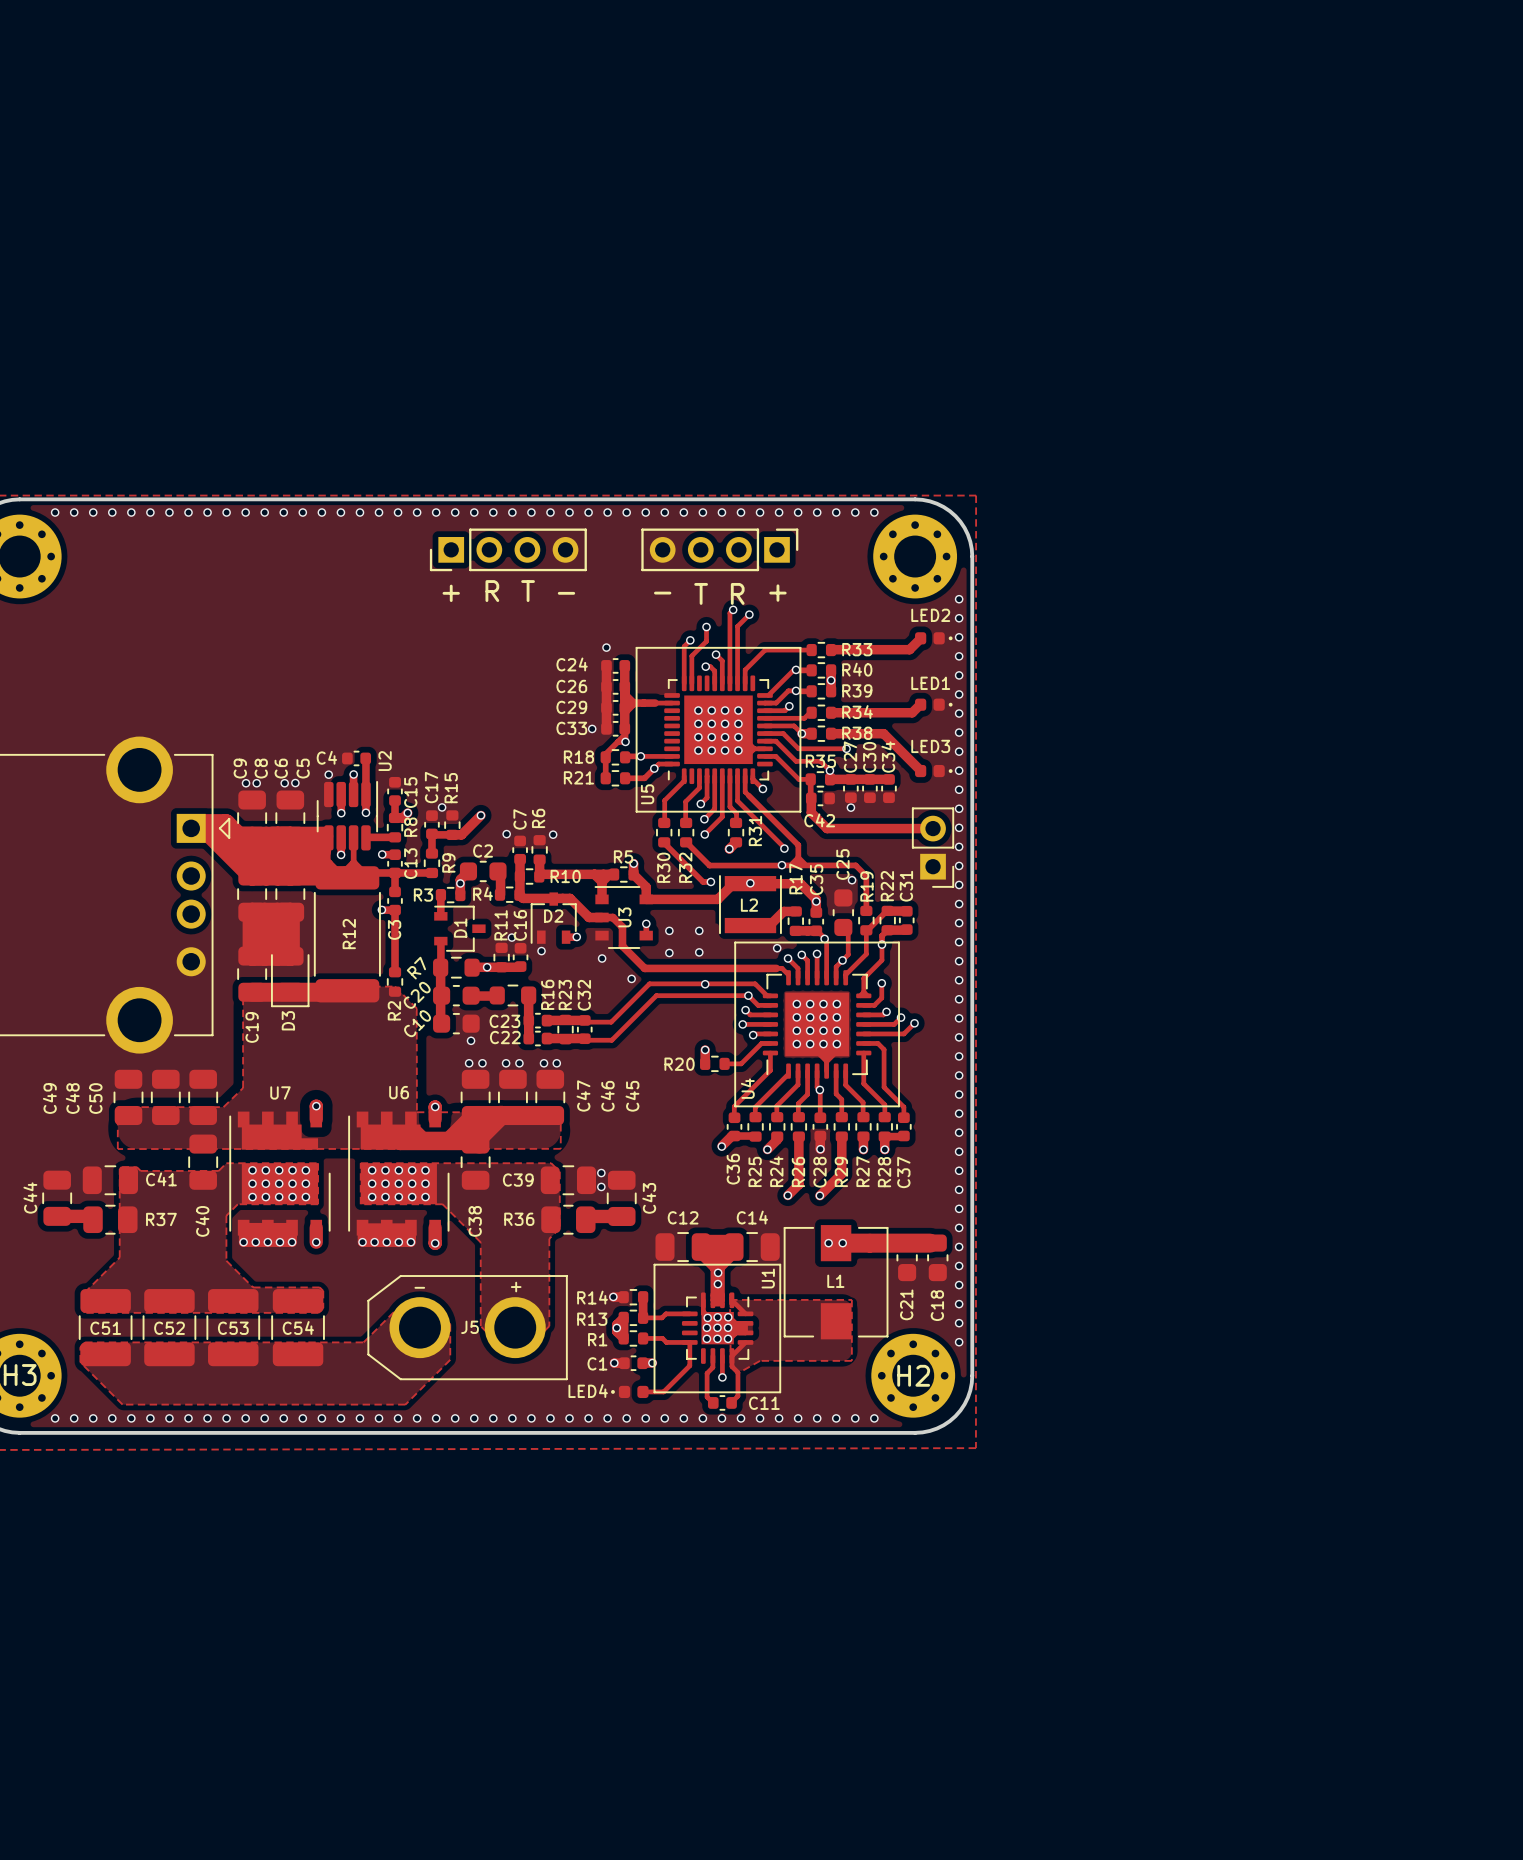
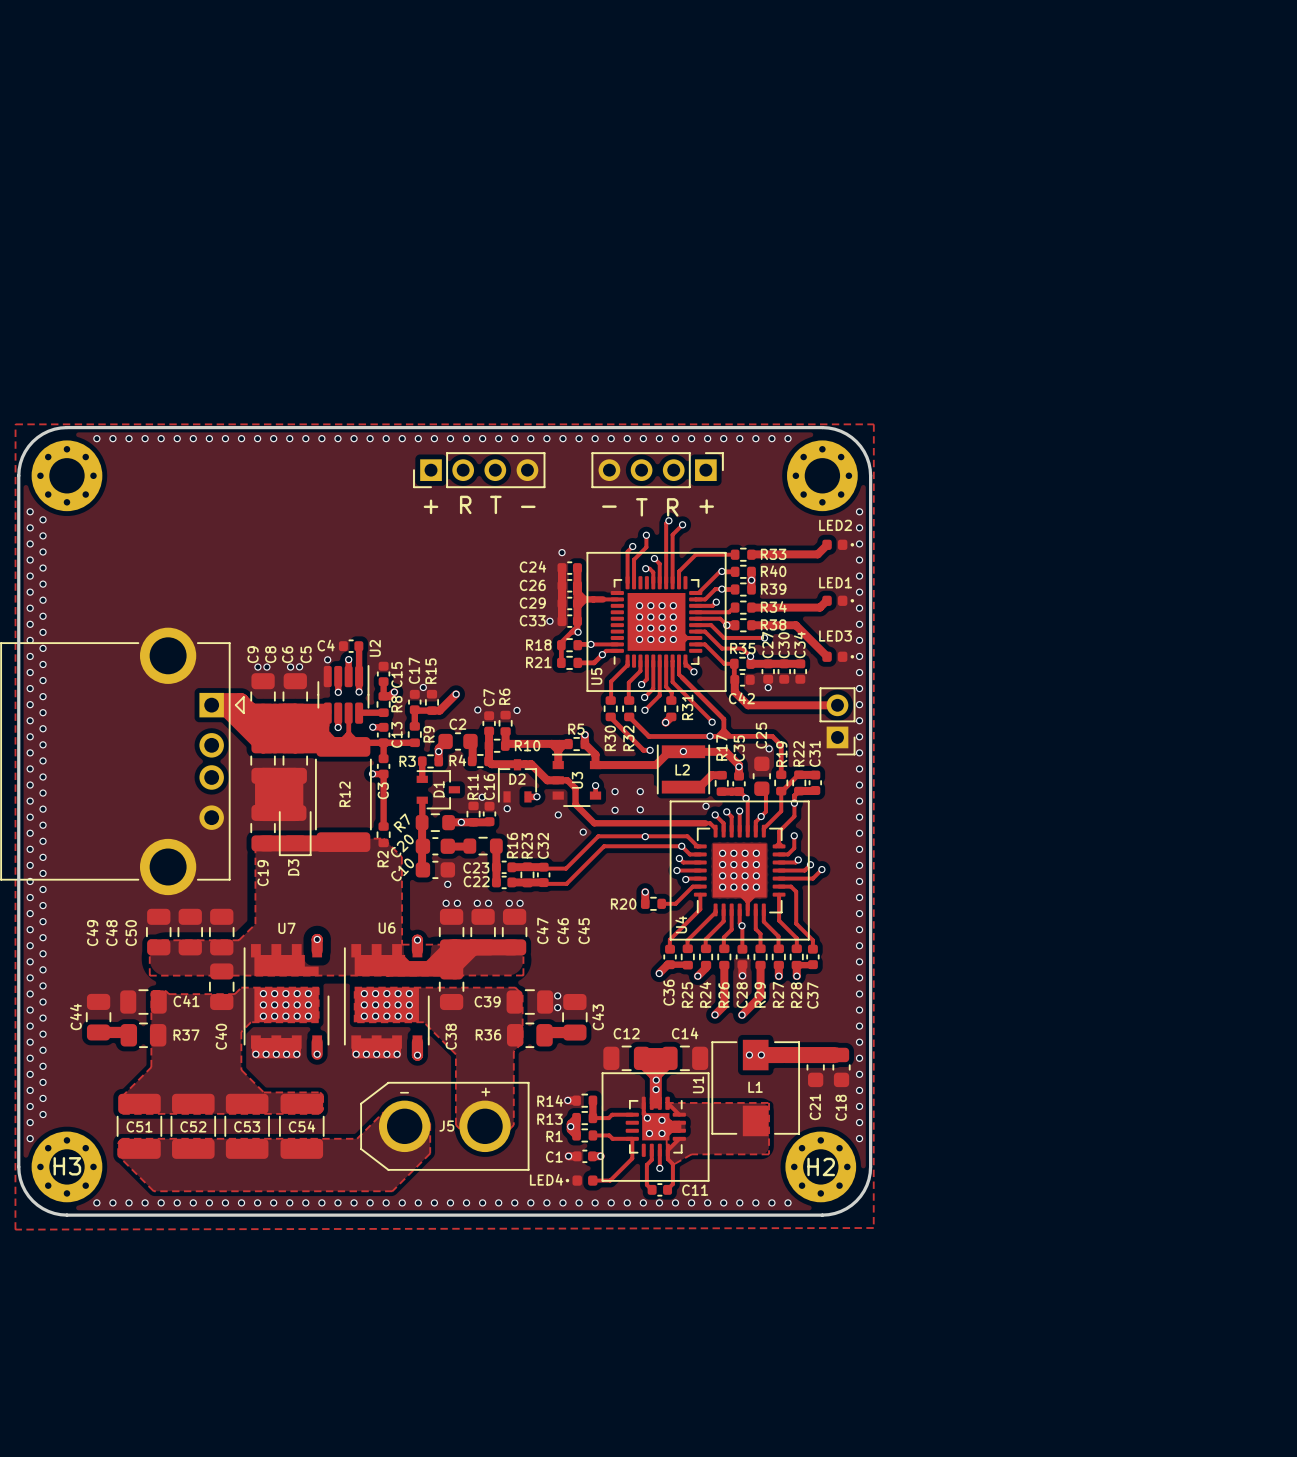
via: (717, 1317) -> none
via: (728, 1317) -> none
via: none -> (661, 1120)
via: (706, 1327) -> none
via: (717, 1327) -> none
via: (728, 1327) -> none
via: none -> (649, 1133)
via: none -> (661, 1133)
via: (706, 1338) -> none
via: (717, 1338) -> none
via: (728, 1338) -> none

